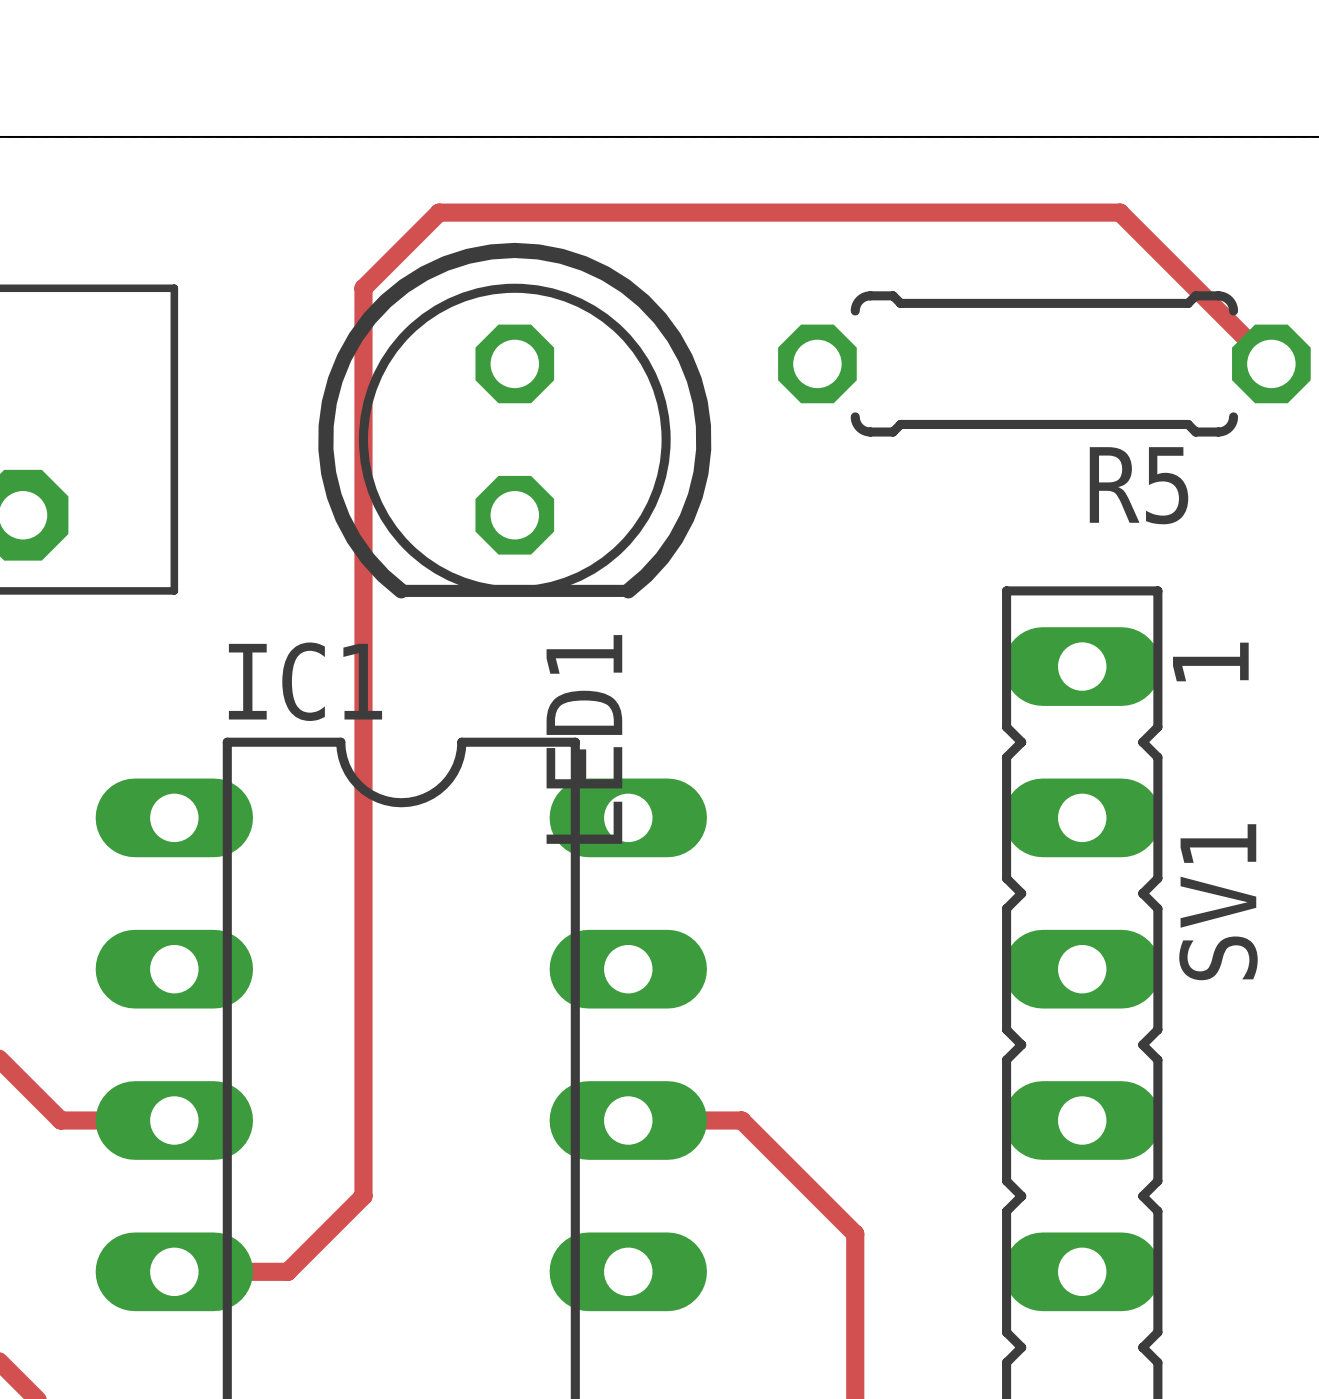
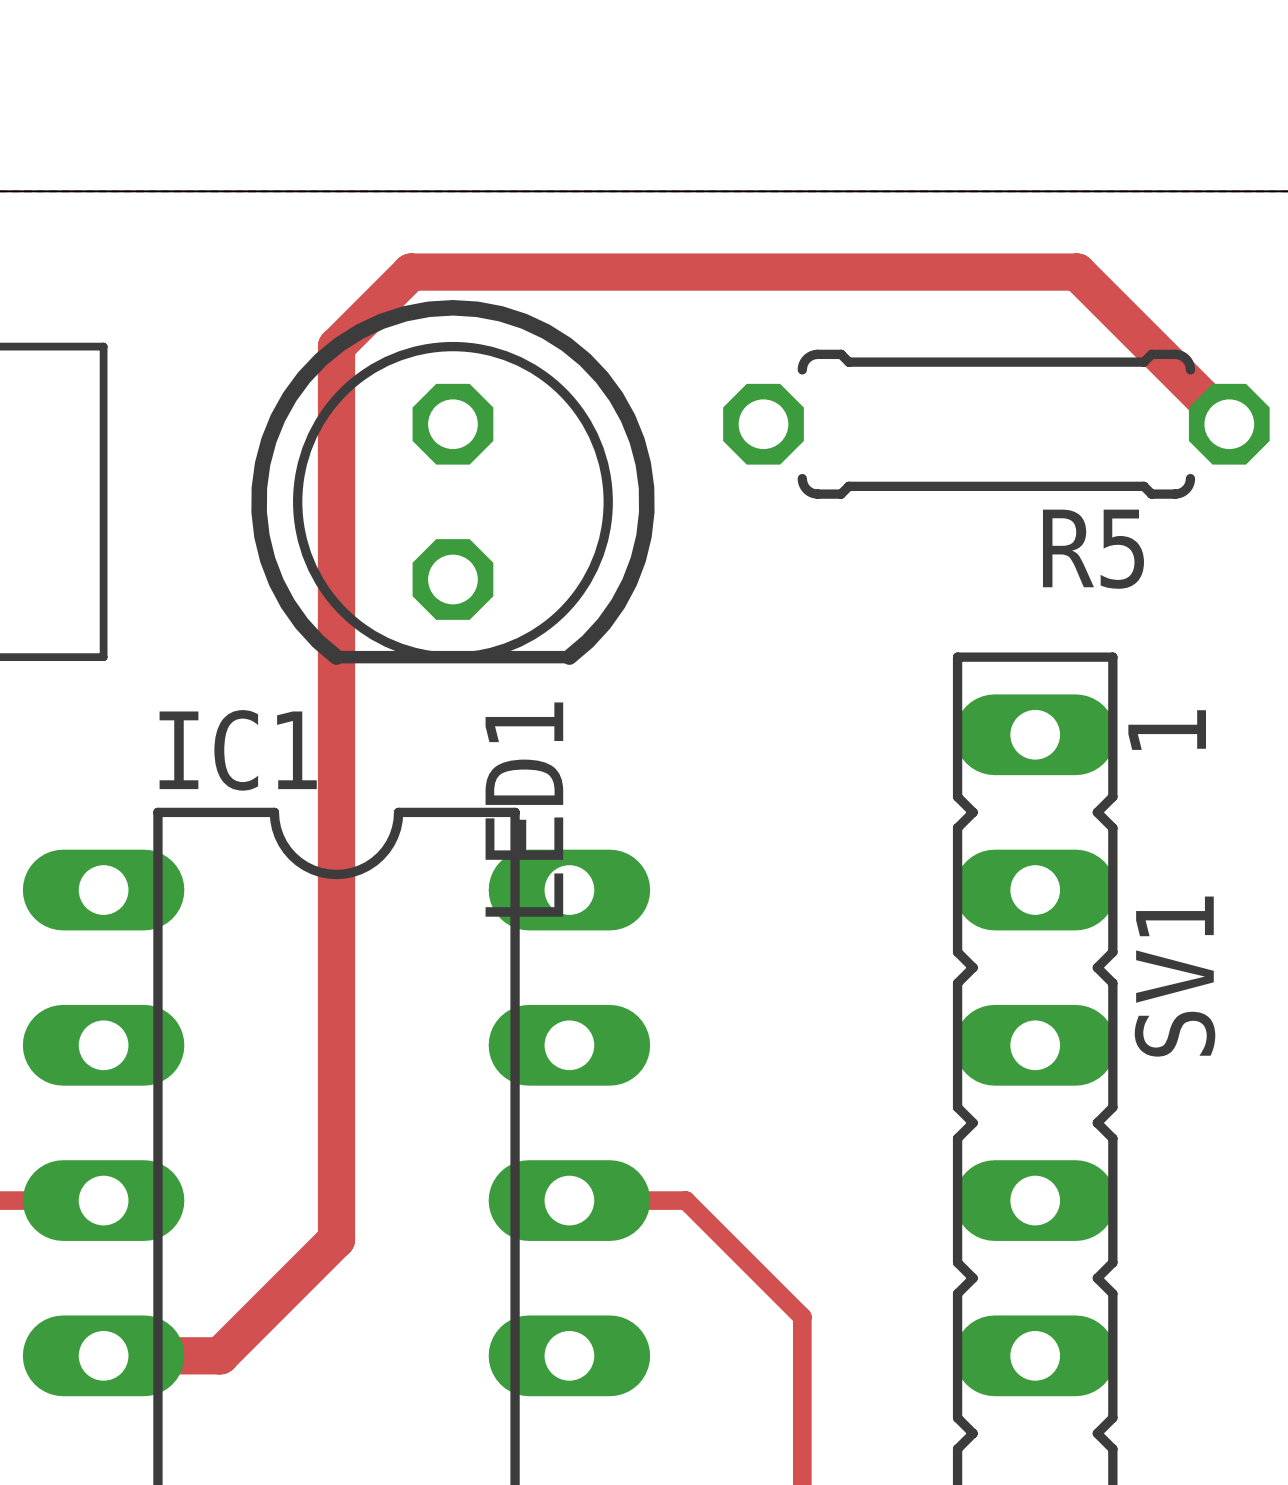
track: (1123, 215) (1120, 212) (439, 212) (363, 288) (363, 1196) -> (1077, 272) (411, 272) (336, 346) (336, 1239) (297, 1278)
track width: thin (1123, 215) (1271, 363) -> thick (1077, 272) (1229, 424)
track width: thin (363, 1196) (287, 1271) (174, 1271) -> thick (297, 1278) (220, 1355) (103, 1355)

